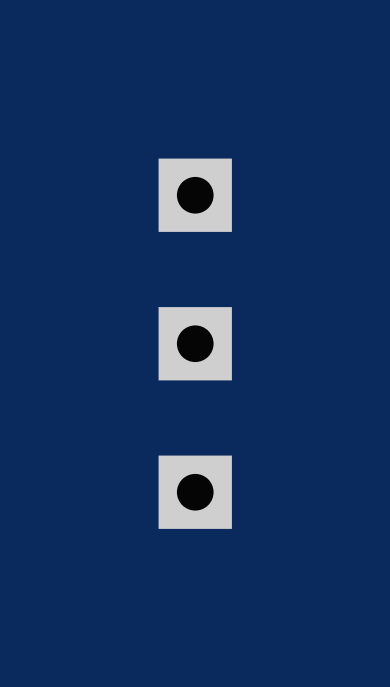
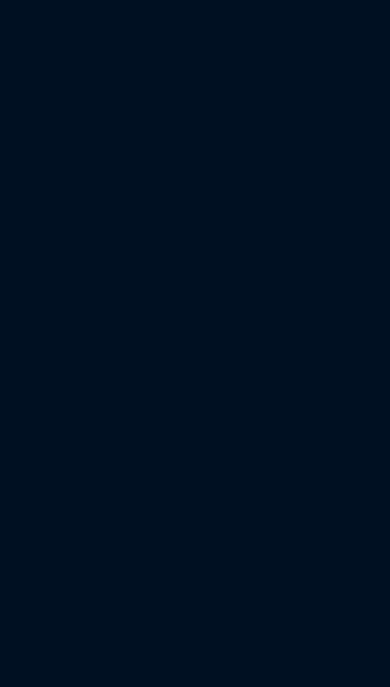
part: (195, 195) -> none
part: (195, 343) -> none
part: (195, 492) -> none

